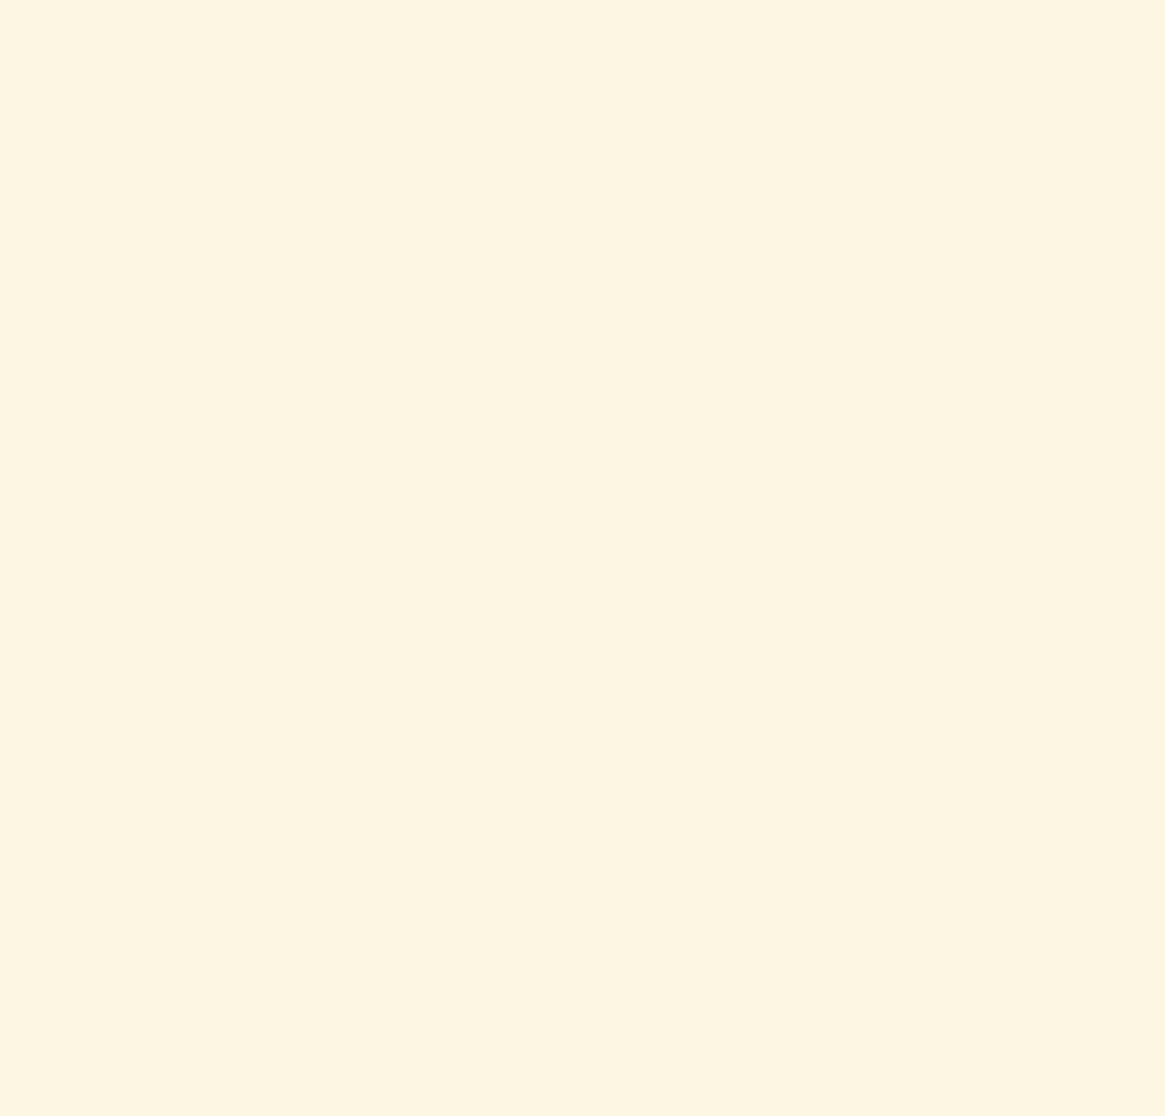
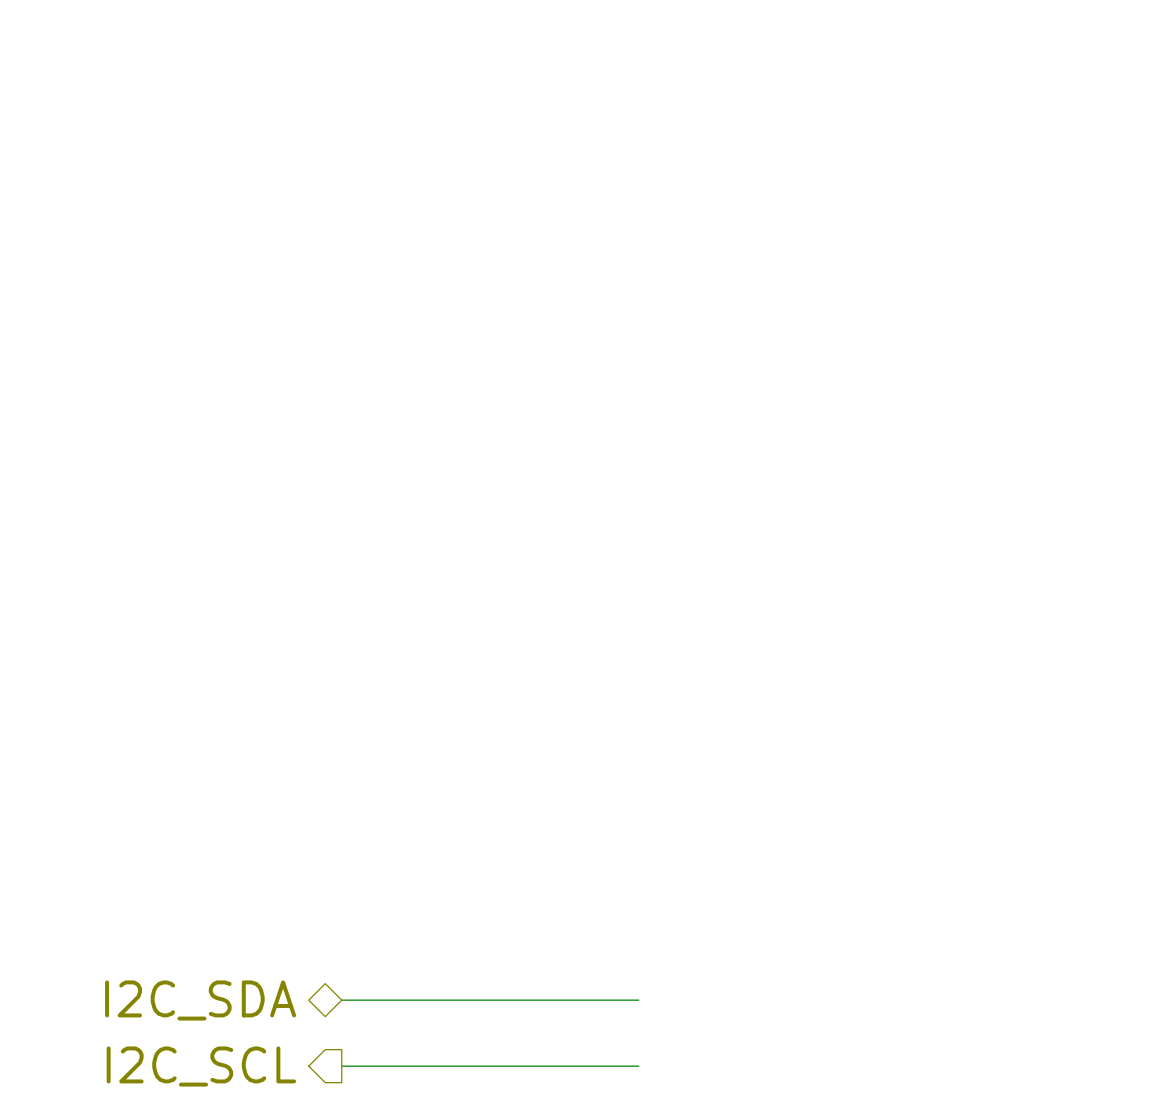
hierarchical label: none -> I2C_SDA (200, 1000)
wire: none -> (341, 1000) (638, 1000)
hierarchical label: none -> I2C_SCL (201, 1066)
wire: none -> (341, 1066) (638, 1066)

